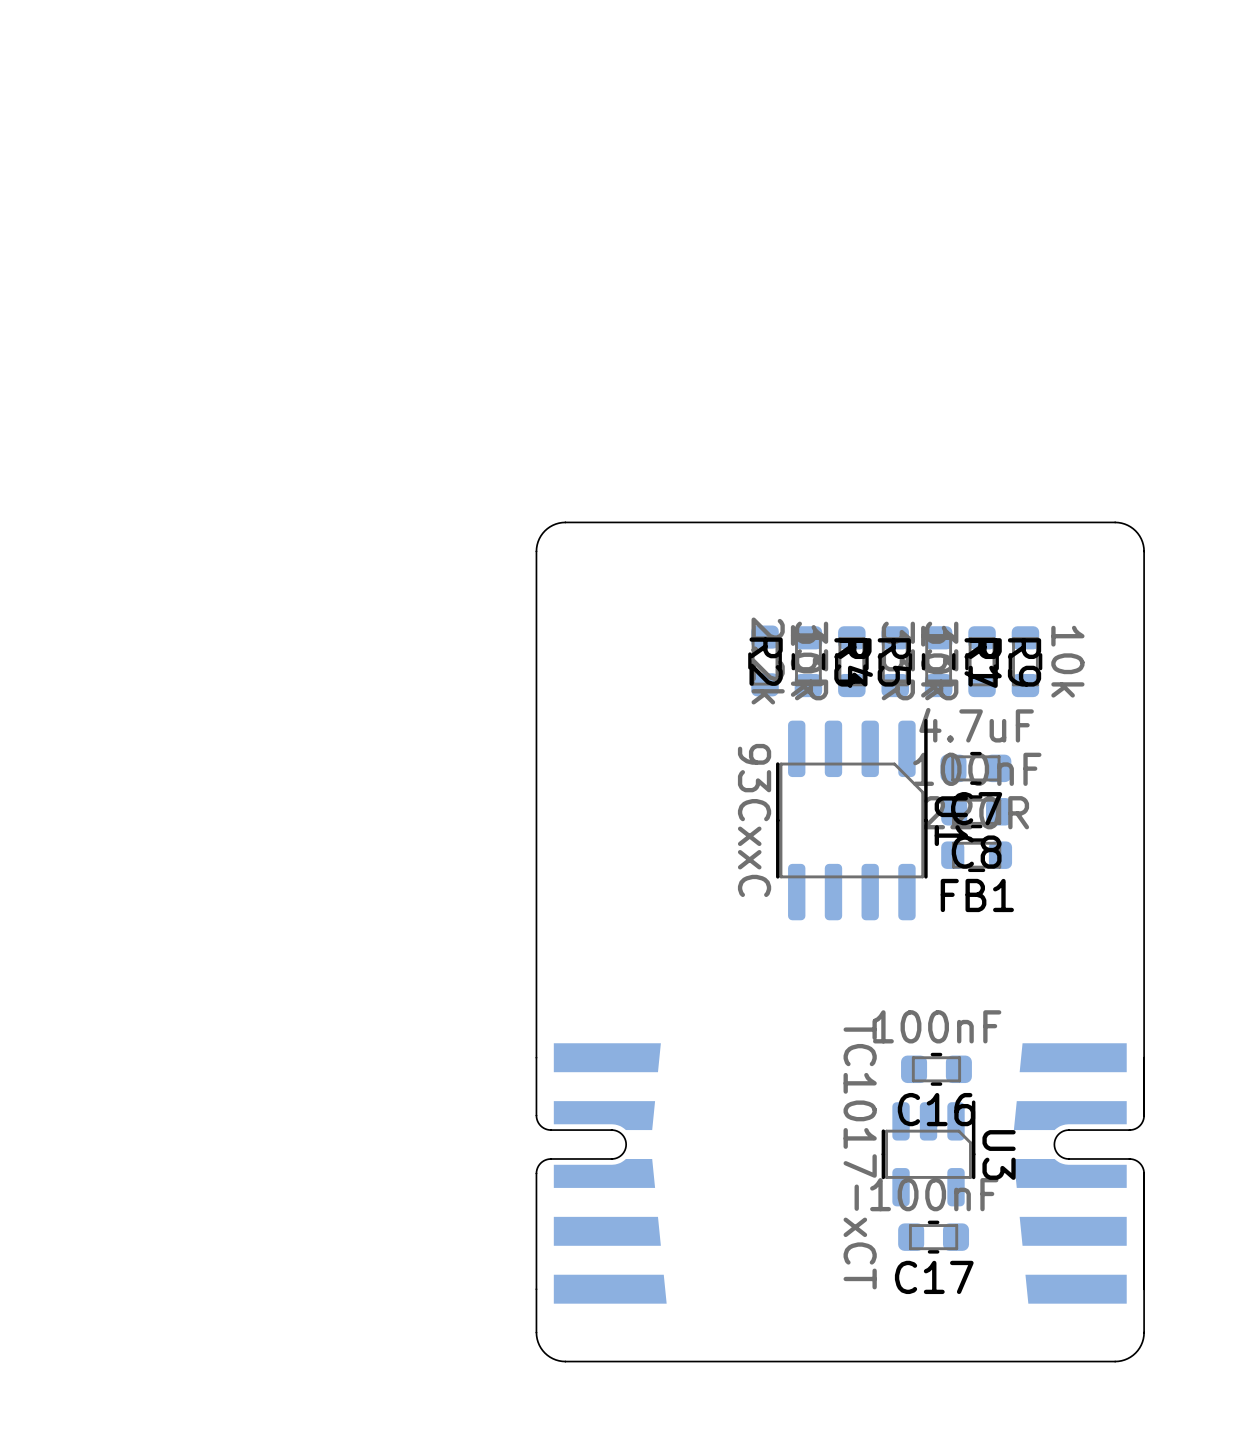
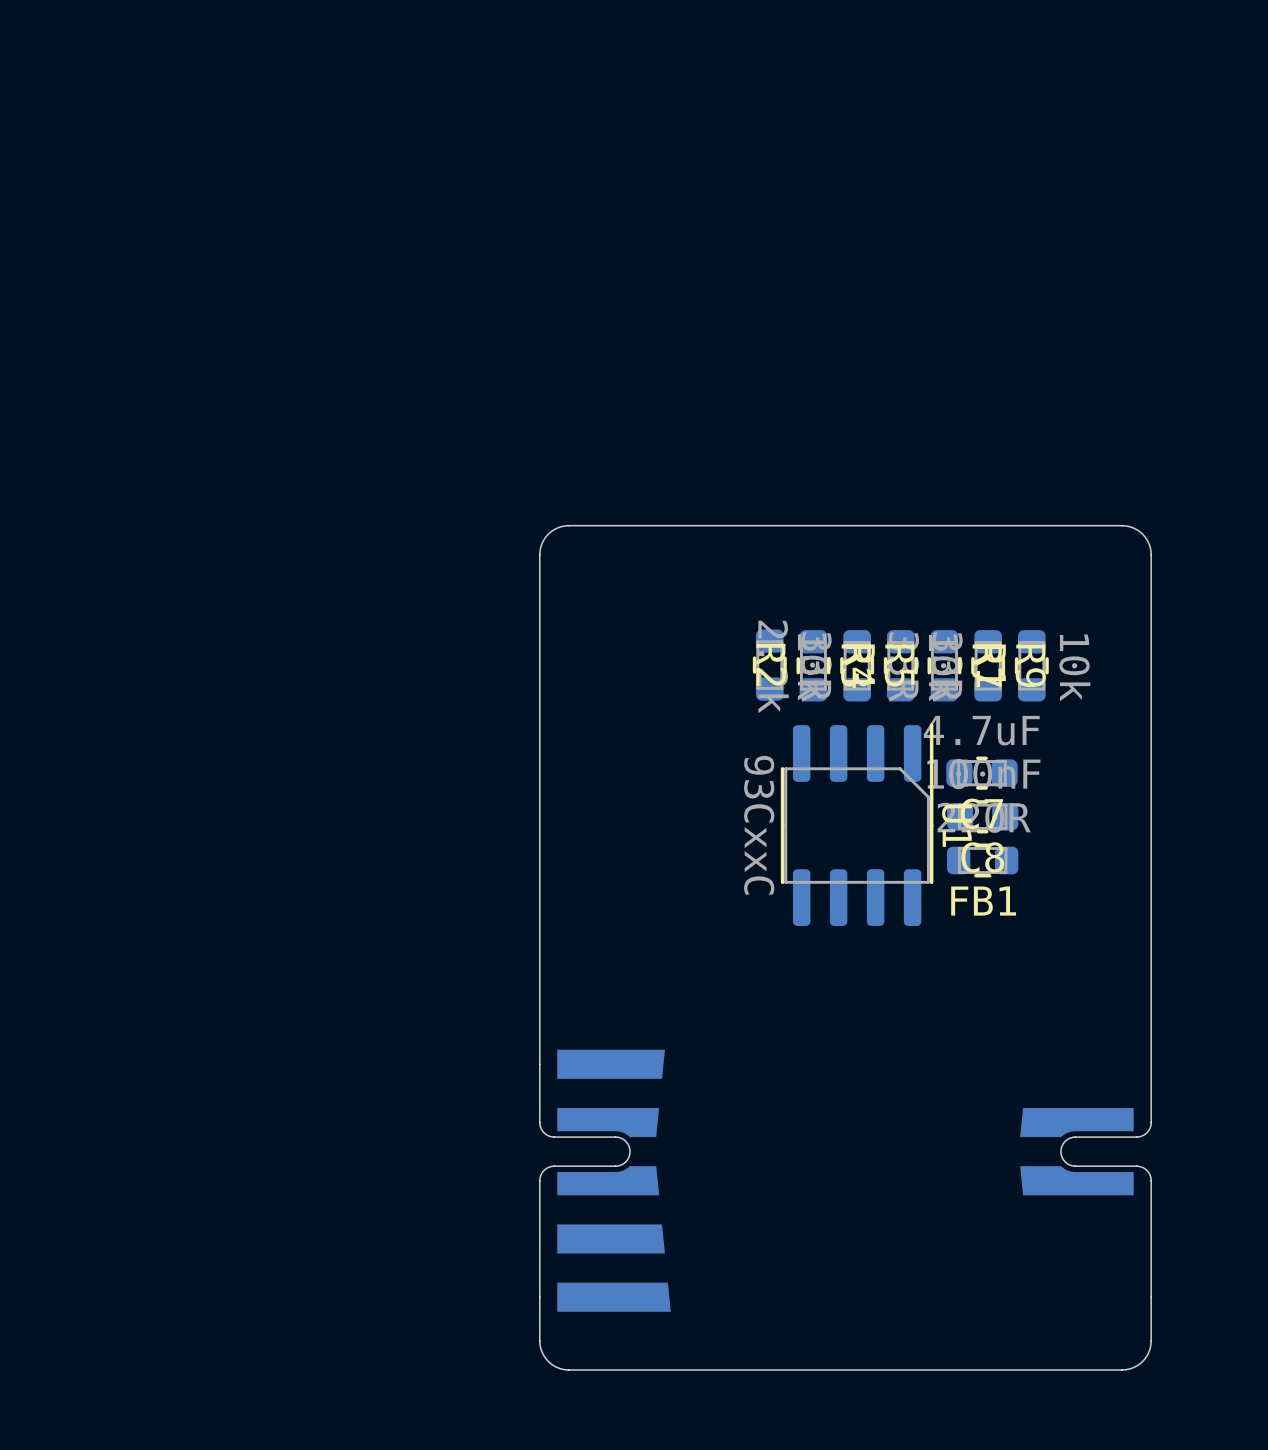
part footprint: [1013, 1043, 1145, 1304] -> [1020, 1107, 1152, 1196]
C16: 100nF (936, 1069) -> none
U3: TC1017-xCT (928, 1153) -> none
C17: 100nF (933, 1237) -> none

